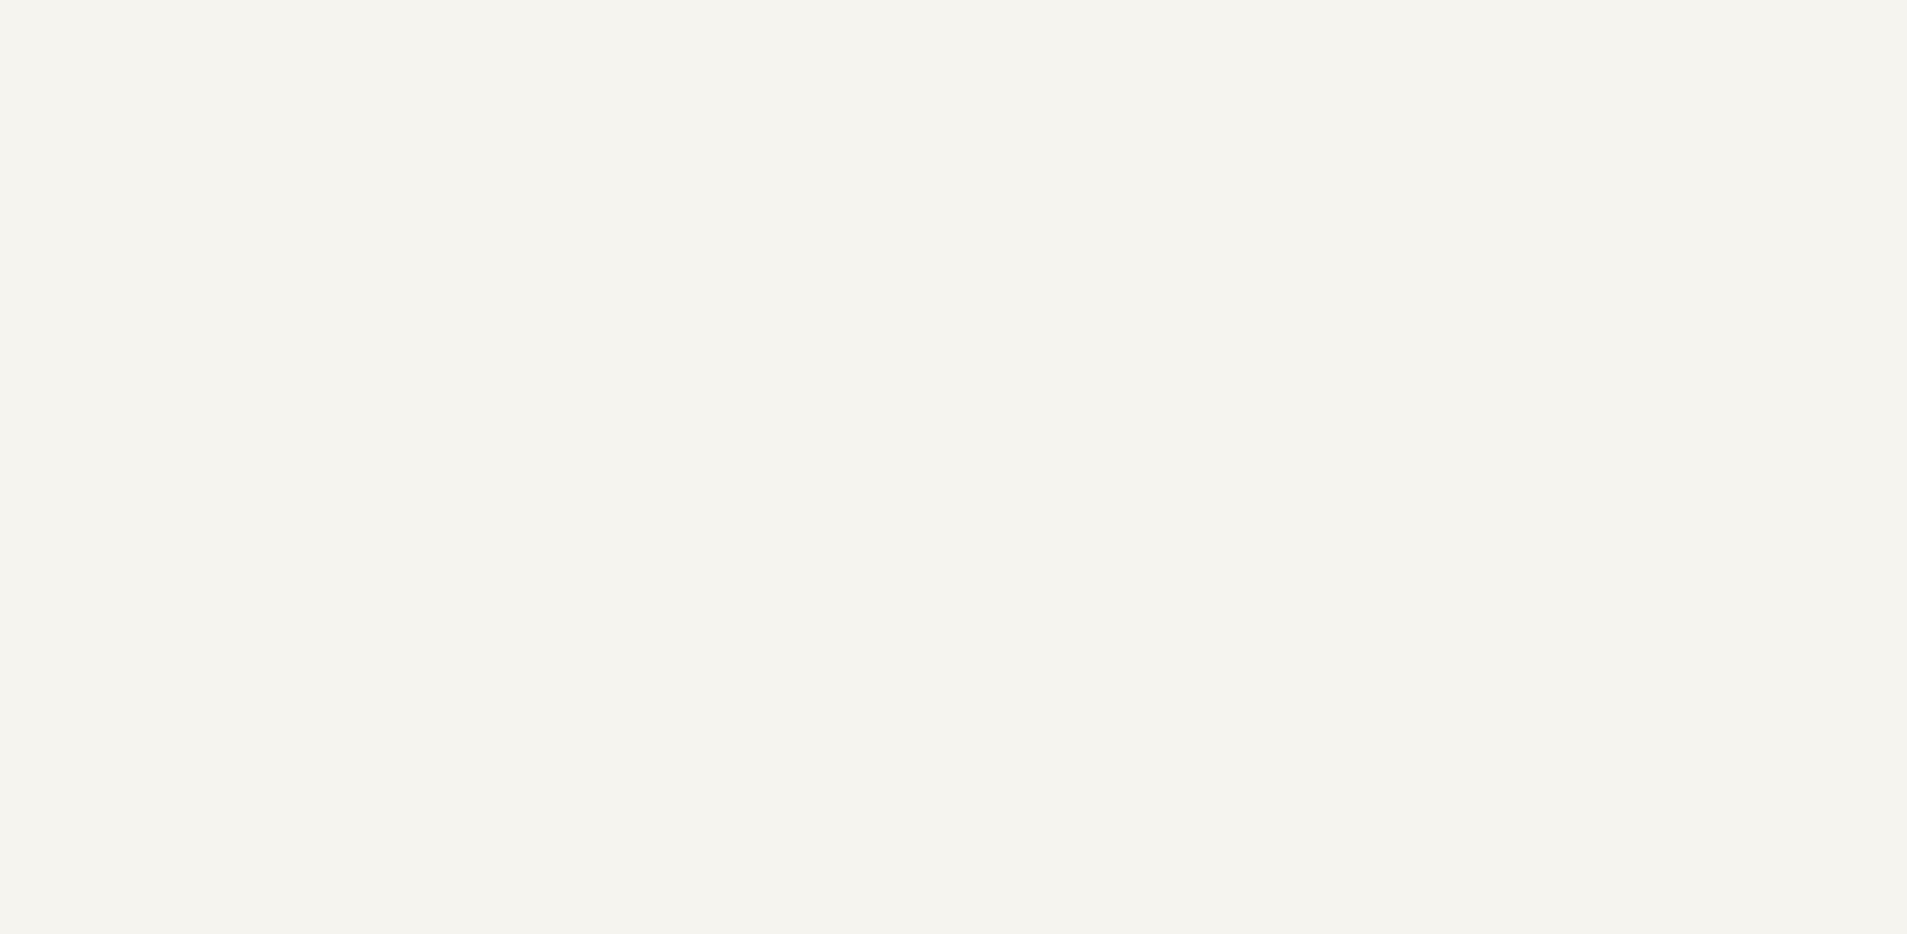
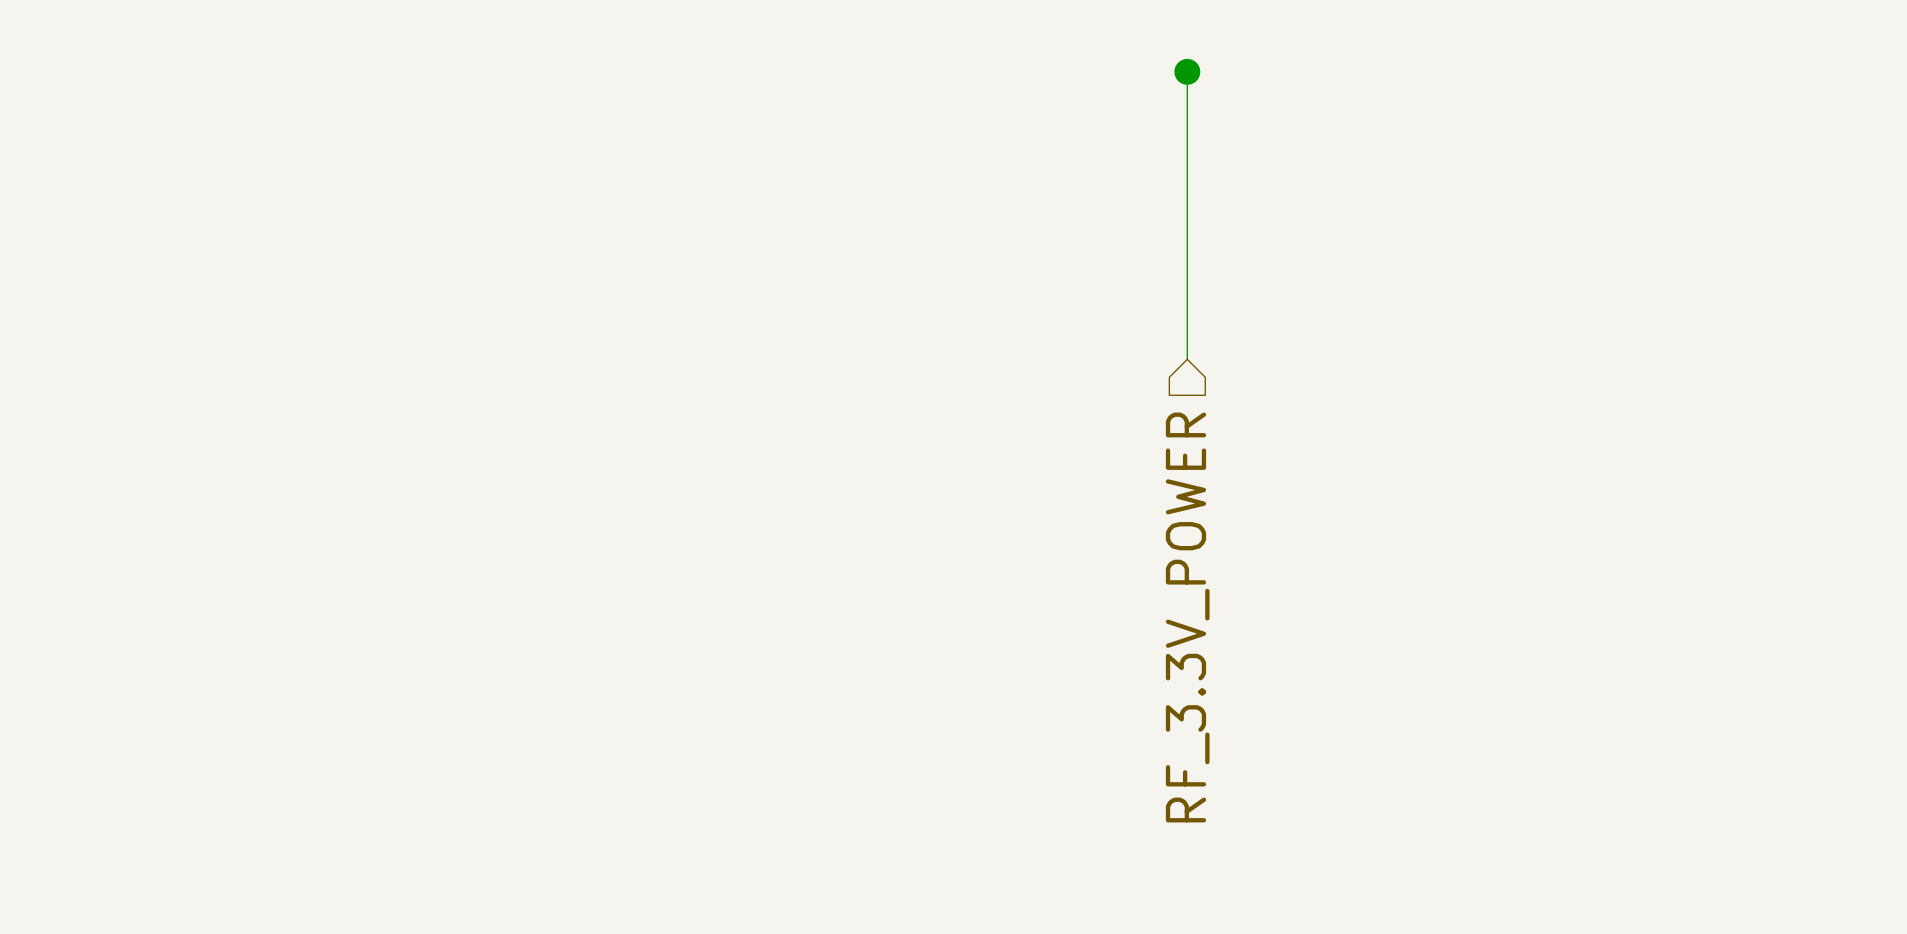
wire: none -> (1187, 71) (1187, 359)
junction: none -> (1187, 71)
hierarchical label: none -> RF_3.3V_POWER (1187, 617)

